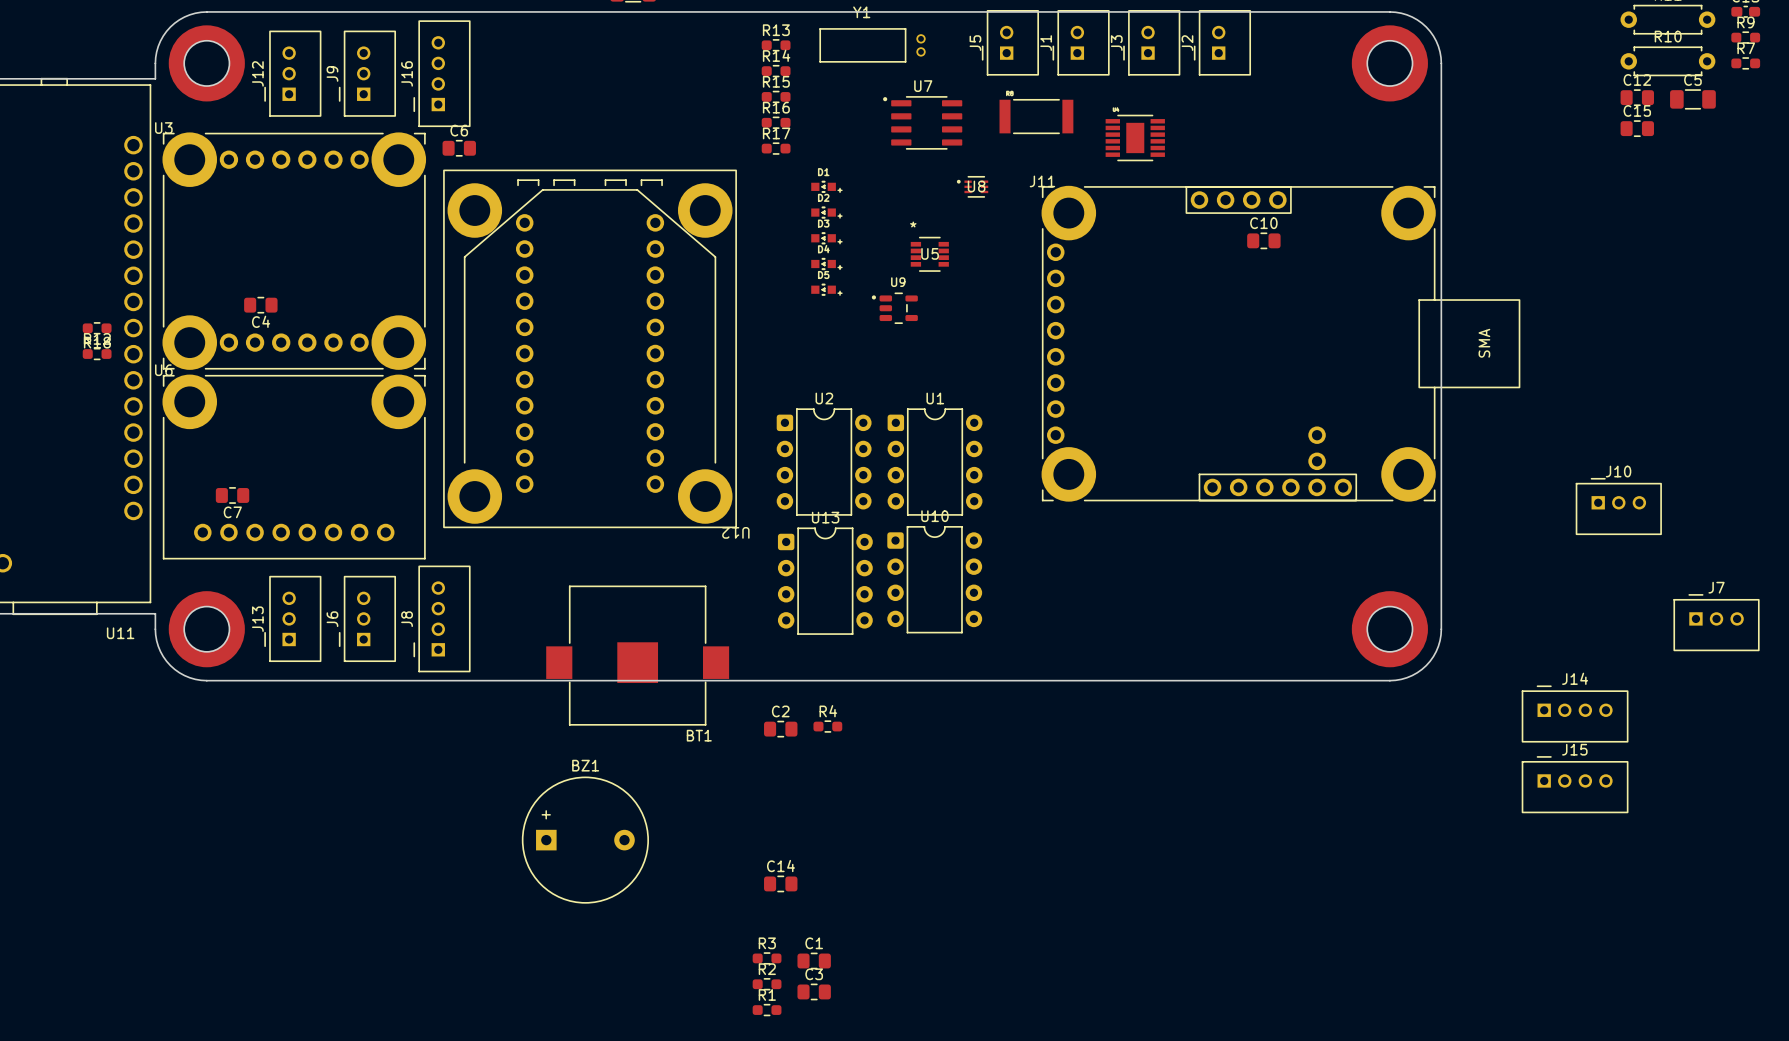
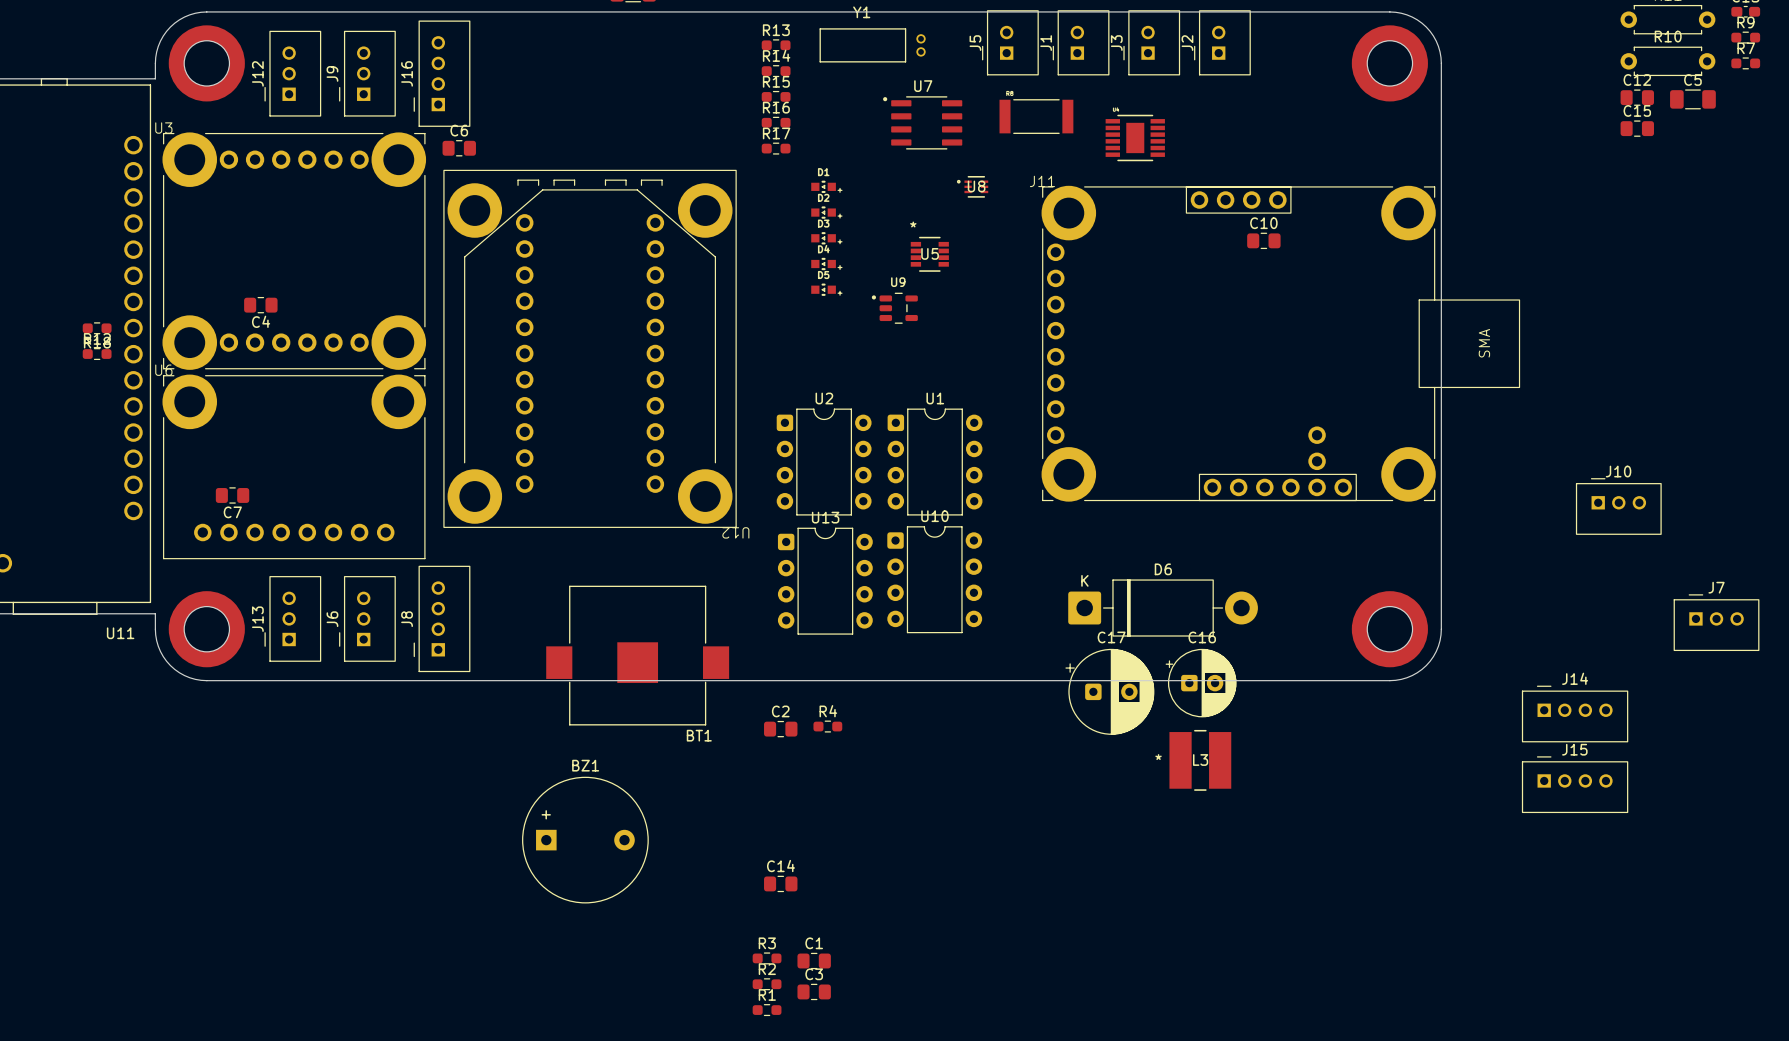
D6: none -> (1163, 608)
C16: none -> (1201, 683)
C17: none -> (1109, 691)
L3: none -> (1200, 760)

